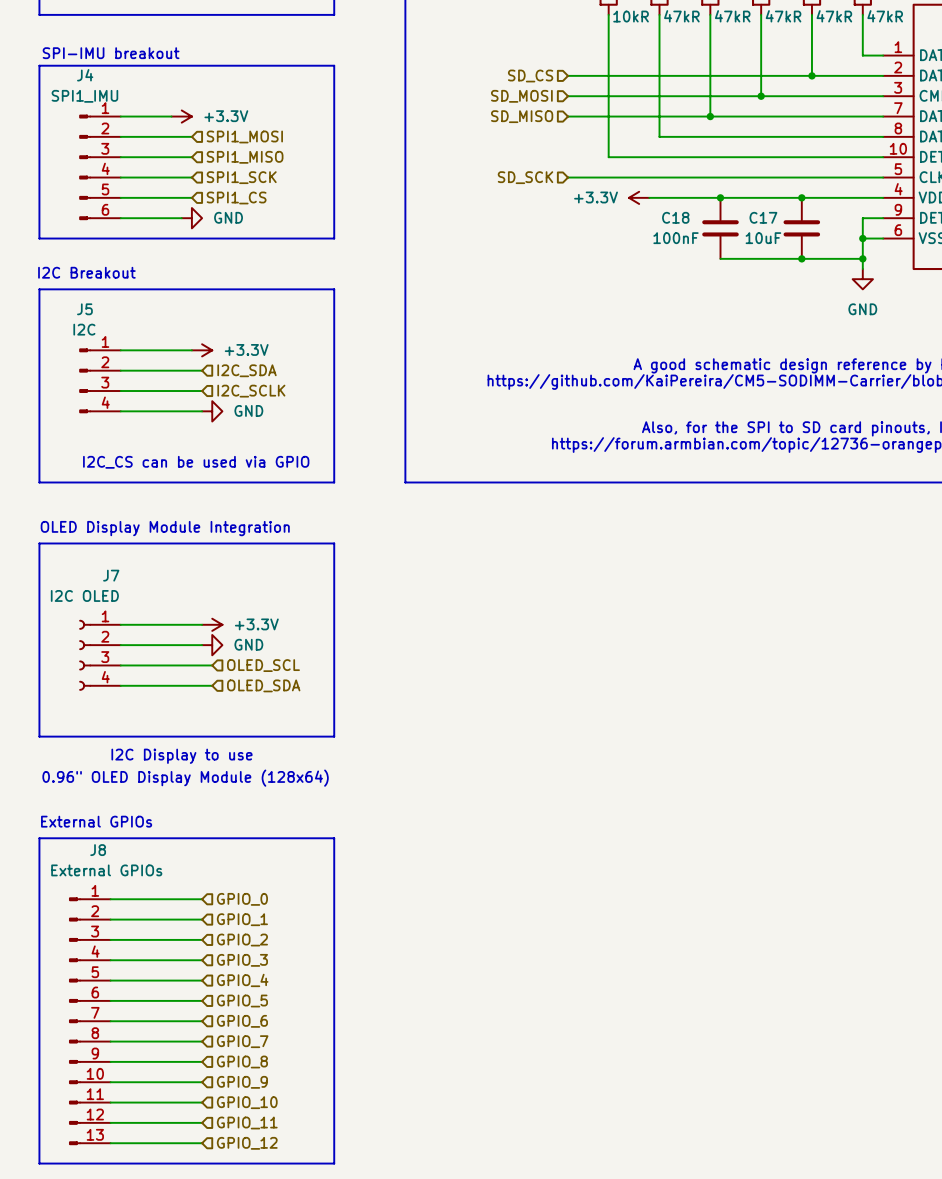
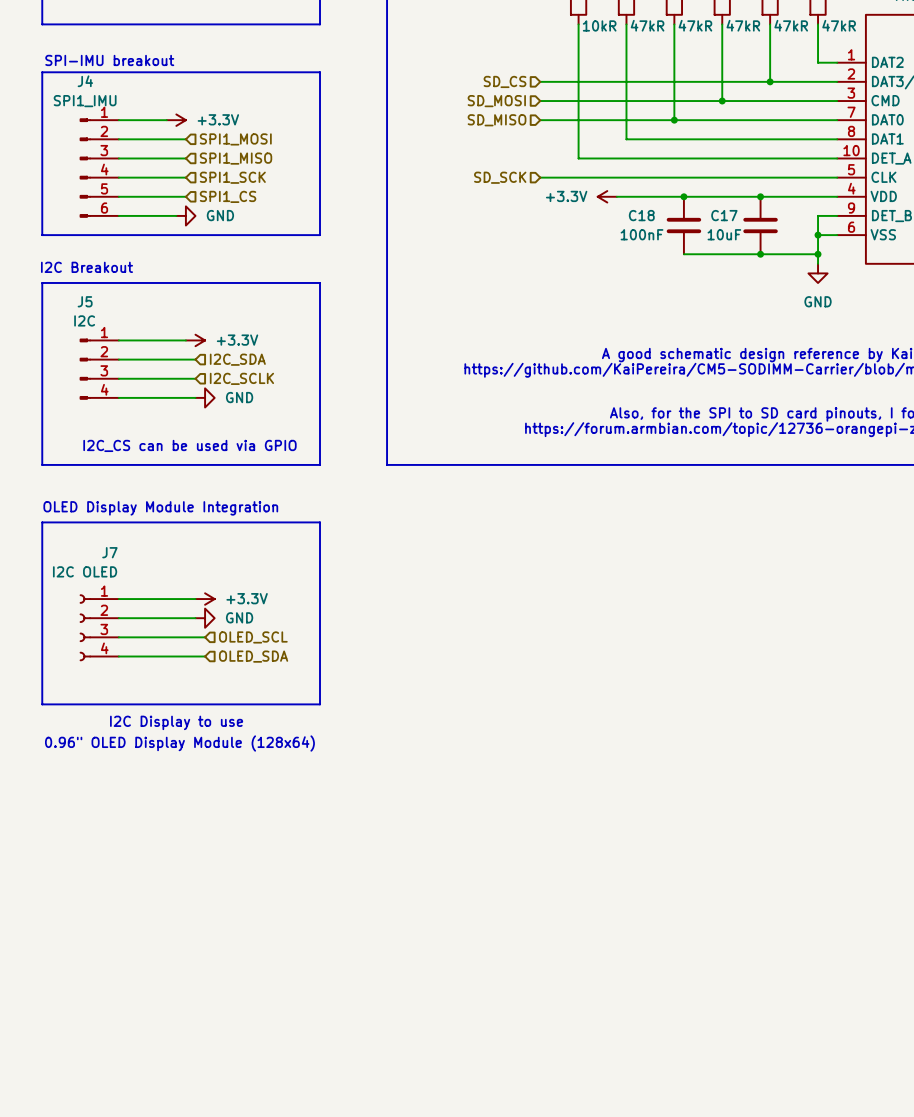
text: External GPIOs (96, 821) -> none
line: (39, 838) (334, 838) (334, 1163) (39, 1163) (39, 838) -> none
wire: (110, 899) (202, 899) -> none
hierarchical label: GPIO_0 (242, 899) -> none
wire: (110, 919) (202, 919) -> none
hierarchical label: GPIO_1 (242, 919) -> none
wire: (110, 939) (202, 939) -> none
hierarchical label: GPIO_2 (242, 940) -> none
wire: (110, 960) (202, 960) -> none
hierarchical label: GPIO_3 (242, 960) -> none
wire: (110, 980) (202, 980) -> none
hierarchical label: GPIO_4 (242, 980) -> none
wire: (110, 1000) (202, 1000) -> none
hierarchical label: GPIO_5 (242, 1001) -> none
J8: External GPIOs (89, 1021) -> none
wire: (110, 1021) (202, 1021) -> none
hierarchical label: GPIO_6 (242, 1021) -> none
wire: (110, 1041) (202, 1041) -> none
hierarchical label: GPIO_7 (242, 1041) -> none
wire: (110, 1061) (202, 1061) -> none
hierarchical label: GPIO_8 (242, 1062) -> none
wire: (110, 1082) (202, 1082) -> none
hierarchical label: GPIO_9 (242, 1082) -> none
wire: (110, 1102) (202, 1102) -> none
hierarchical label: GPIO_10 (247, 1102) -> none
wire: (110, 1122) (202, 1122) -> none
hierarchical label: GPIO_11 (247, 1123) -> none
wire: (110, 1143) (202, 1143) -> none
hierarchical label: GPIO_12 (247, 1143) -> none

